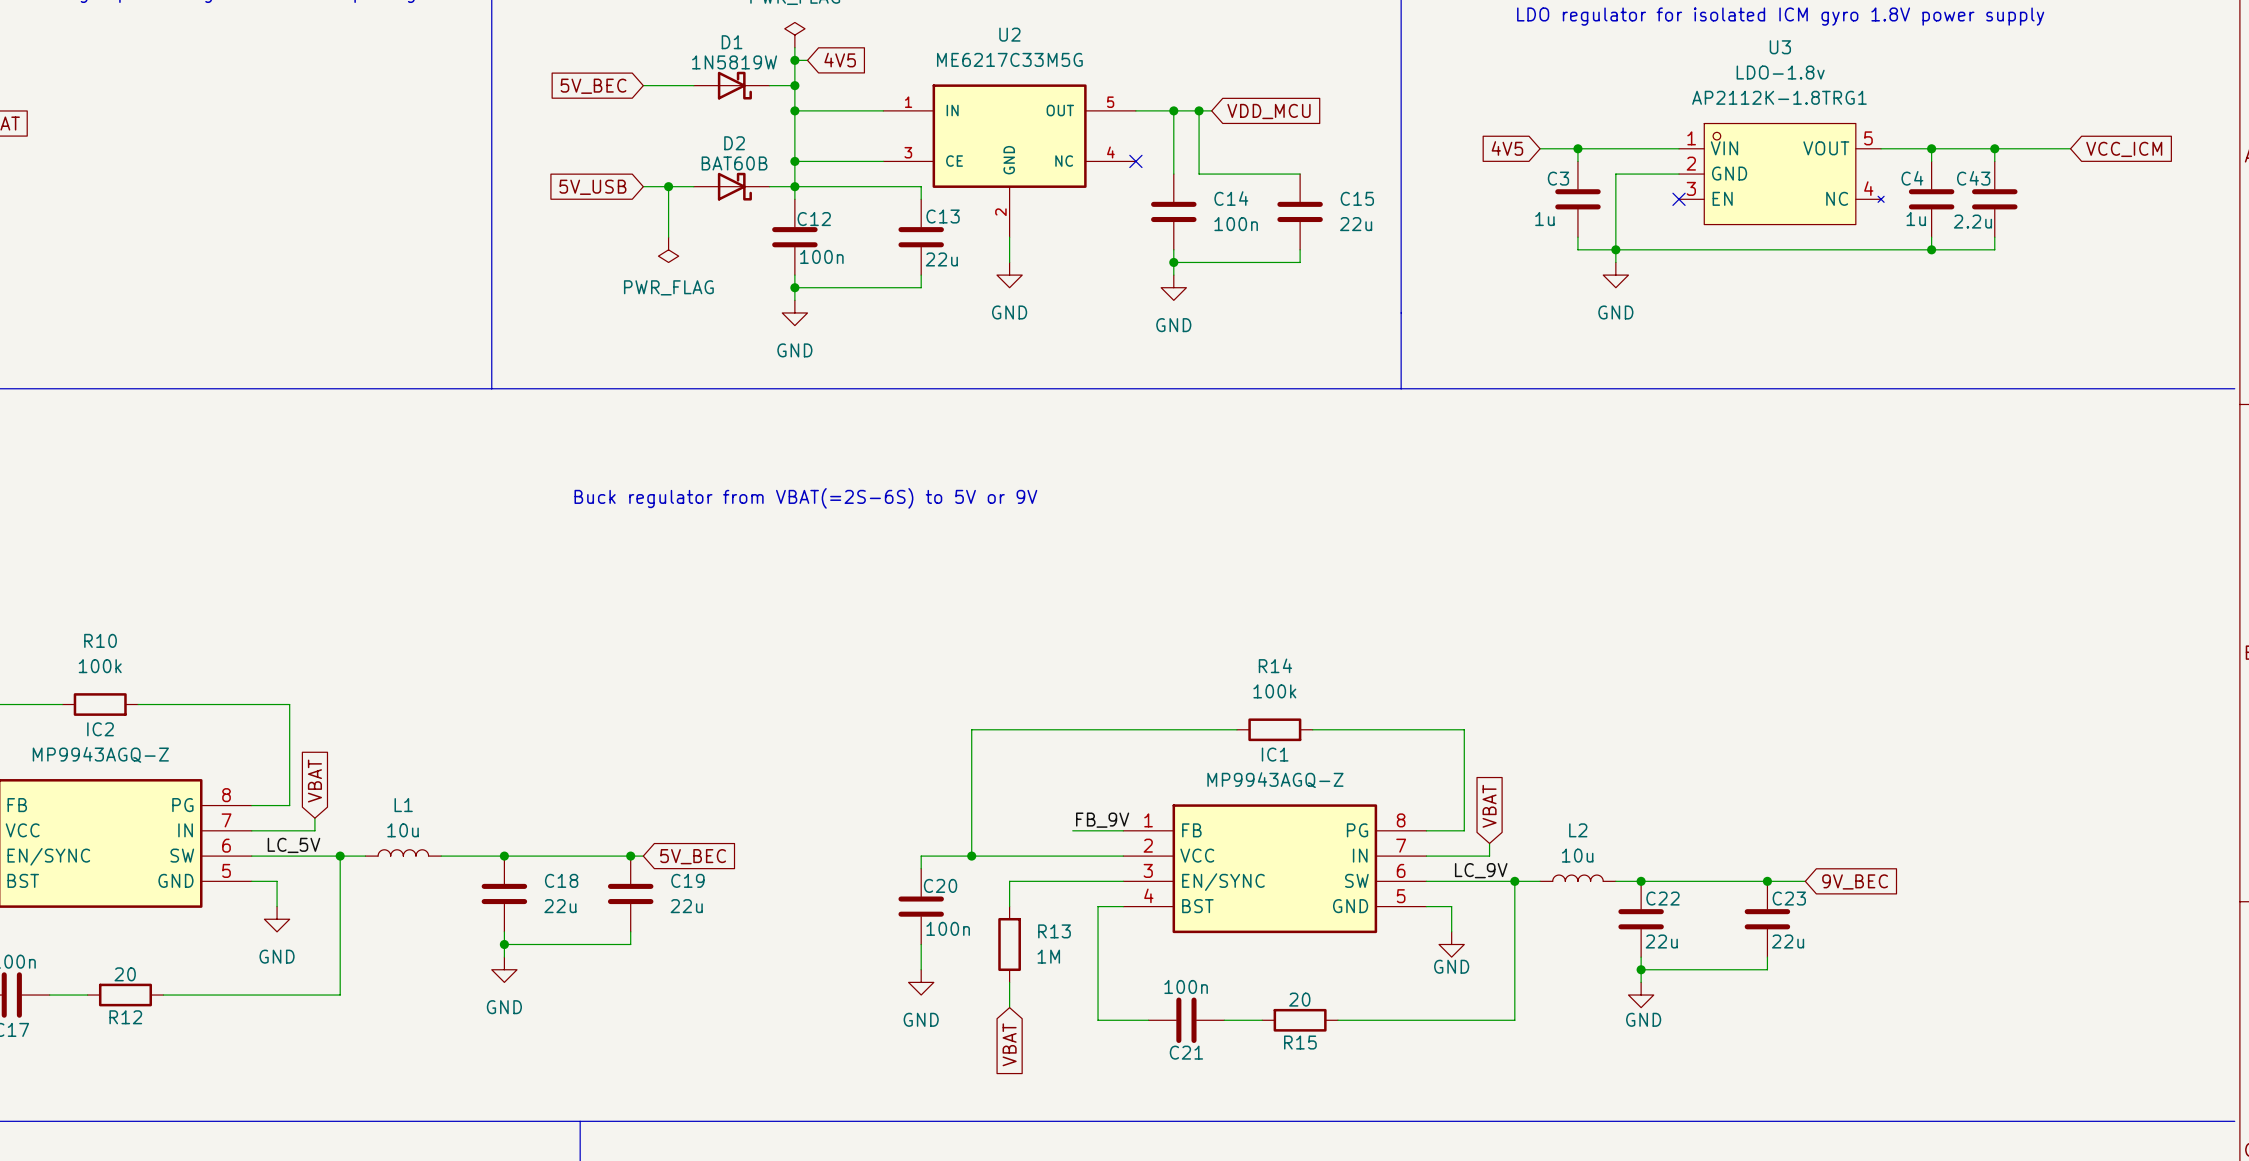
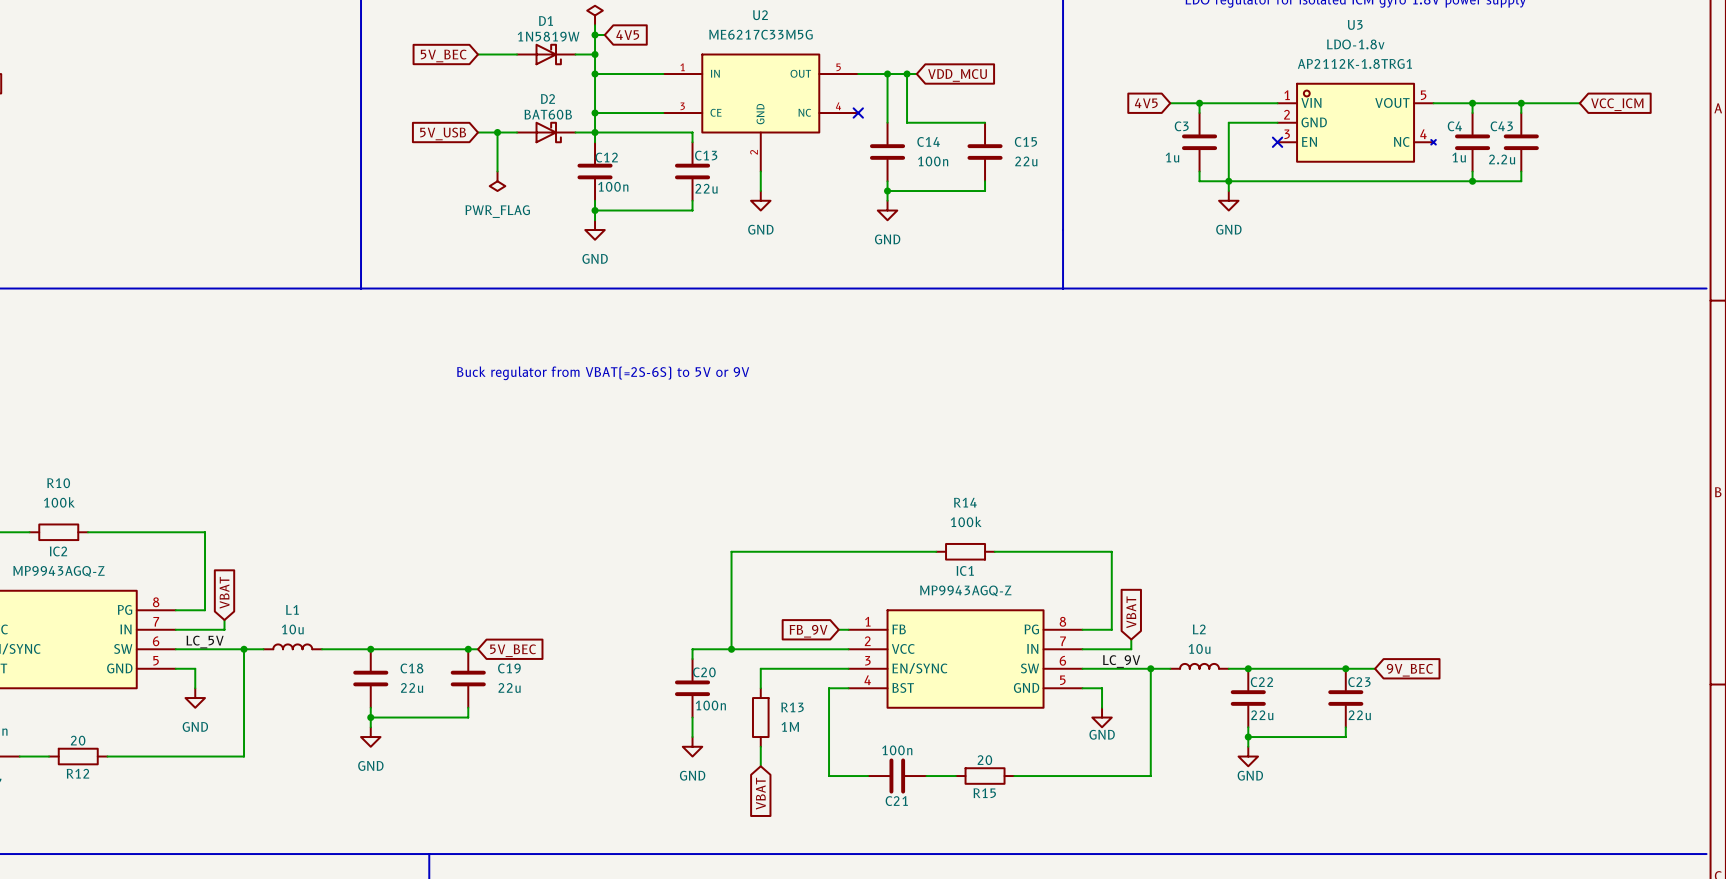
label: FB_9V (1102, 820) -> none
wire: (1072, 830) (1110, 830) -> none
global label: none -> FB_9V (808, 631)

